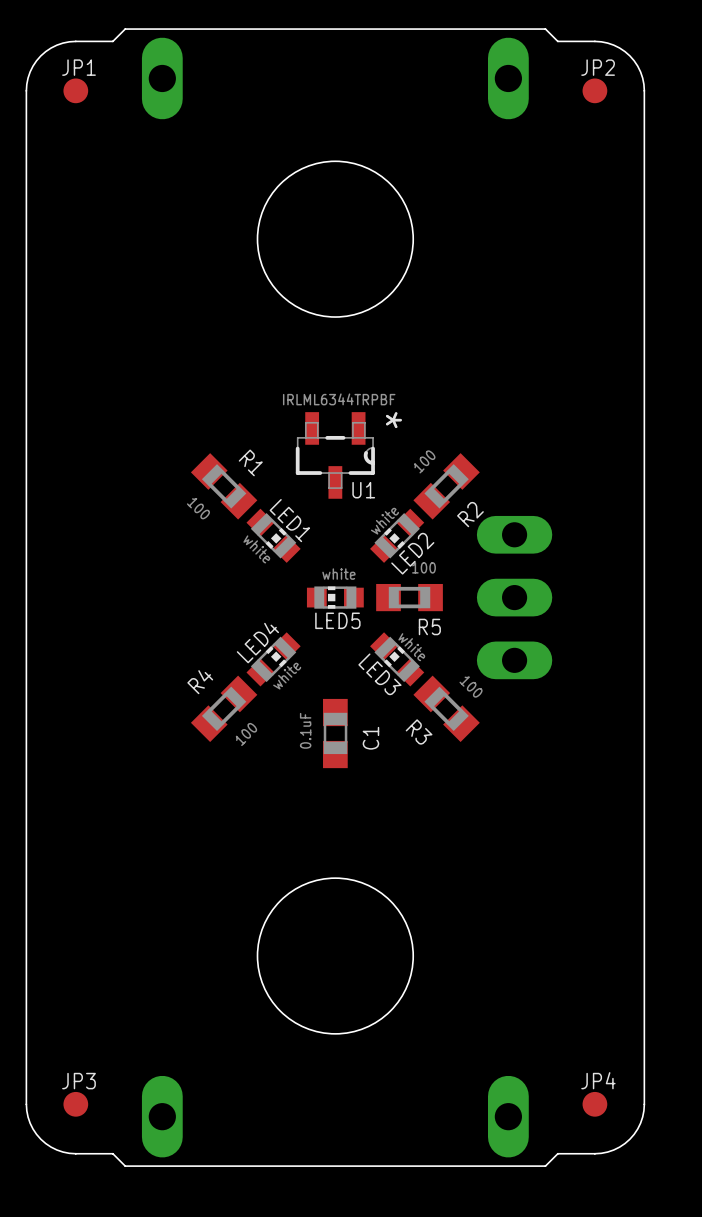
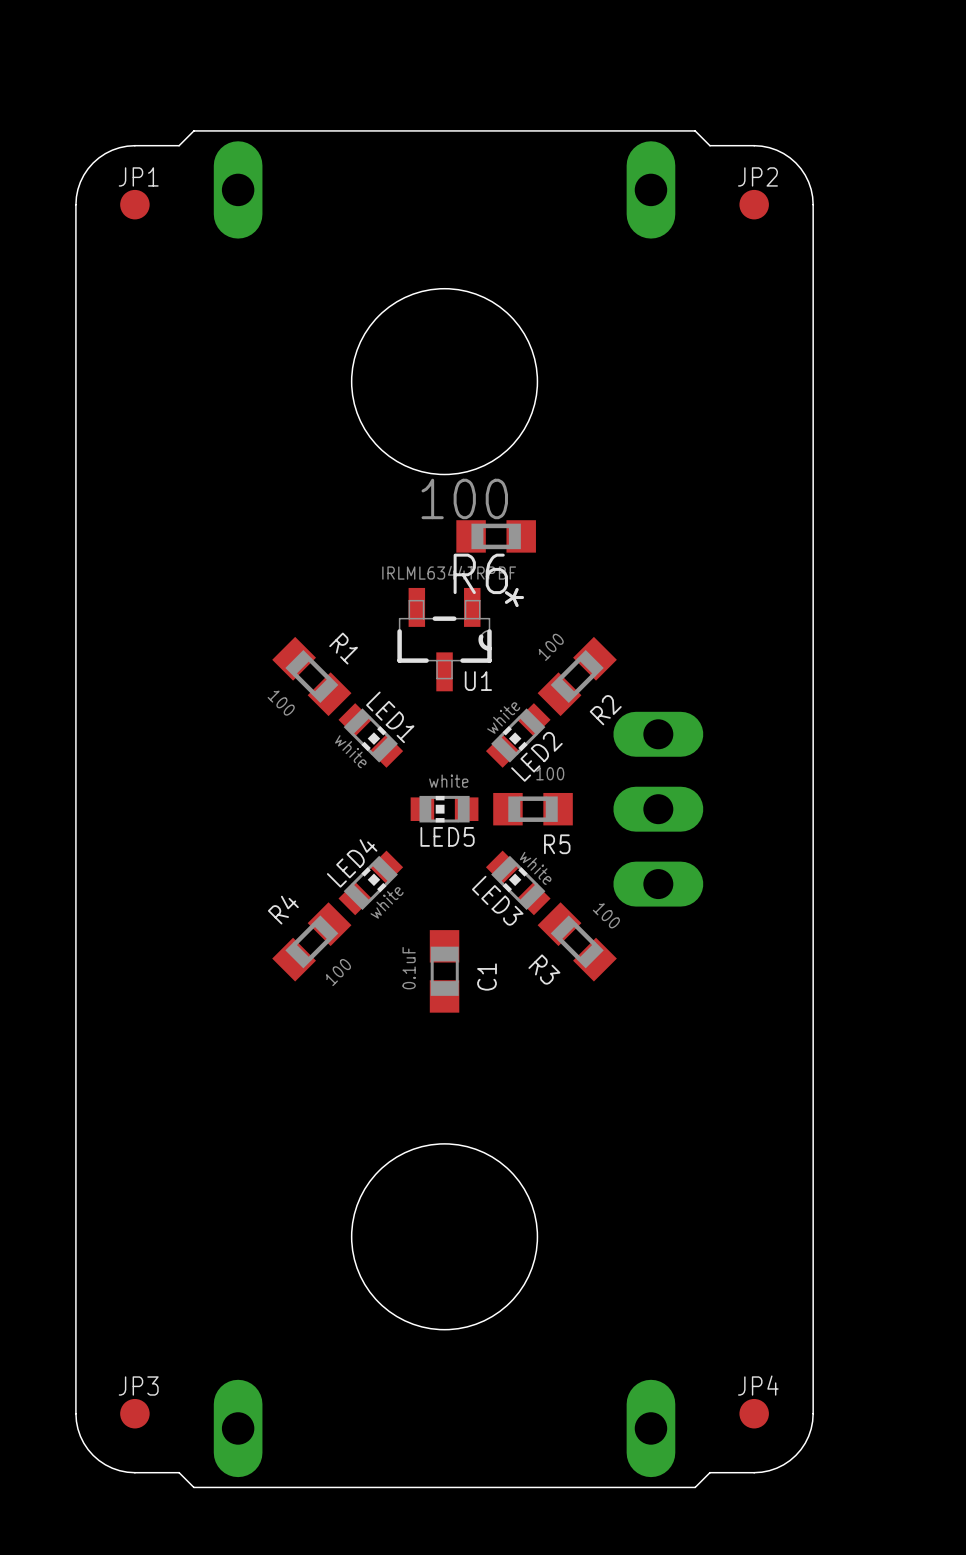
R6: none -> 100 (496, 536)

